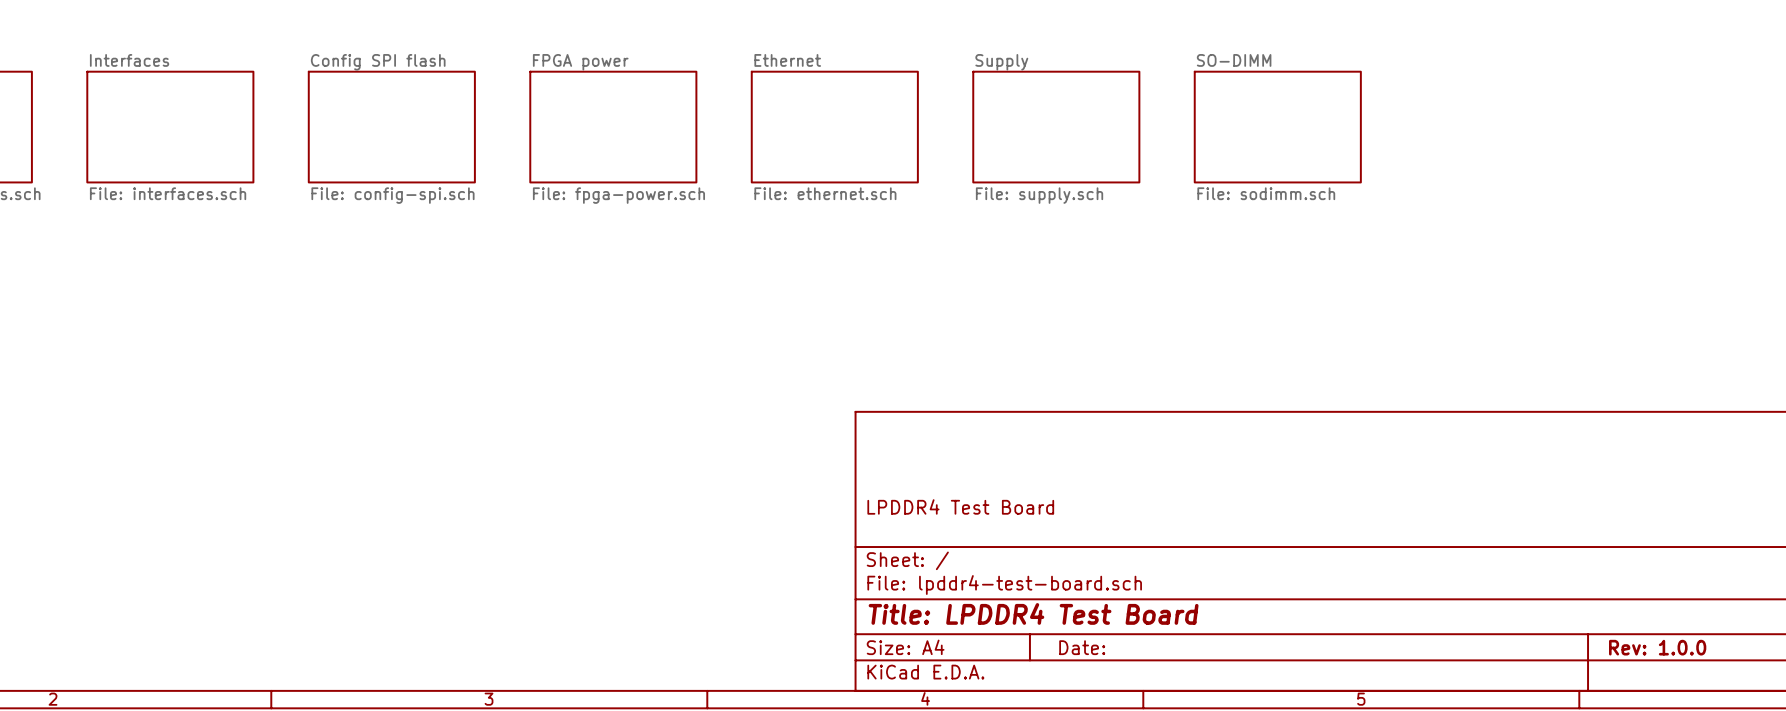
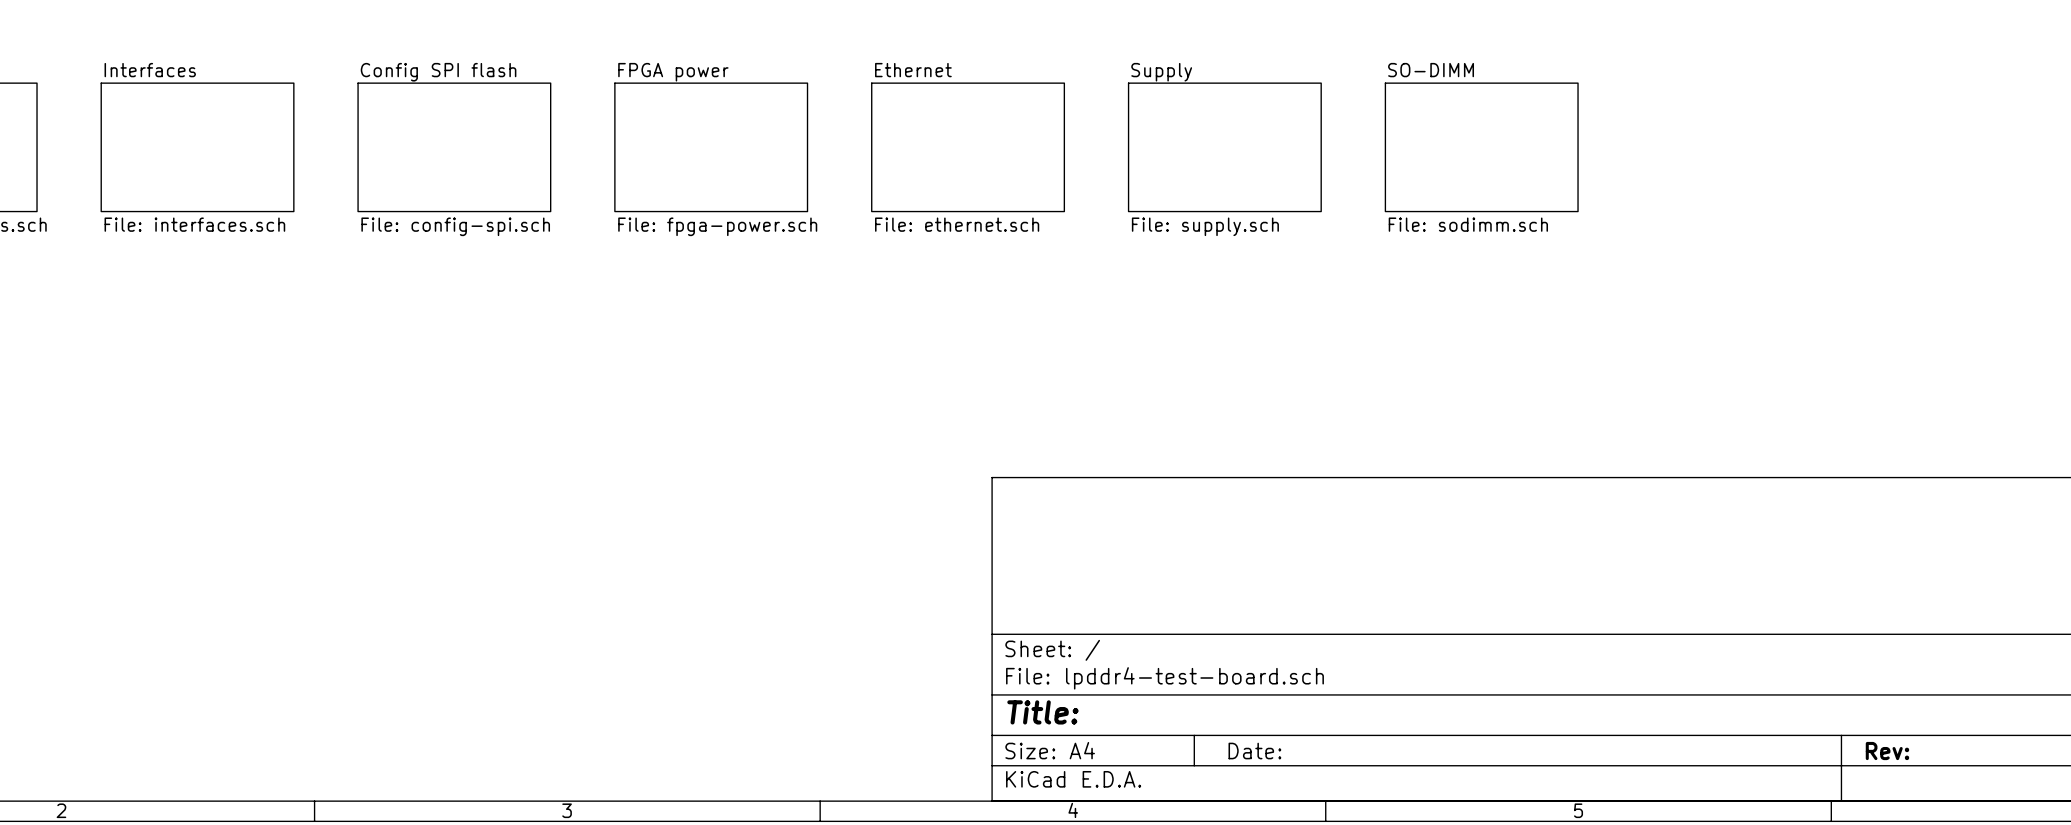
title block: LPDDR4 Test Board (960, 506) -> none
title block: Title: LPDDR4 Test Board (1033, 613) -> Title: (1042, 712)
title block: Rev: 1.0.0 (1657, 647) -> Rev: (1887, 751)

